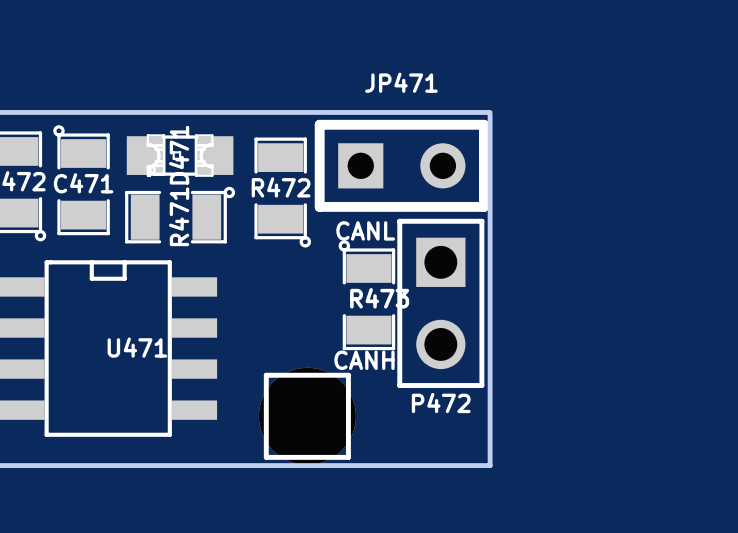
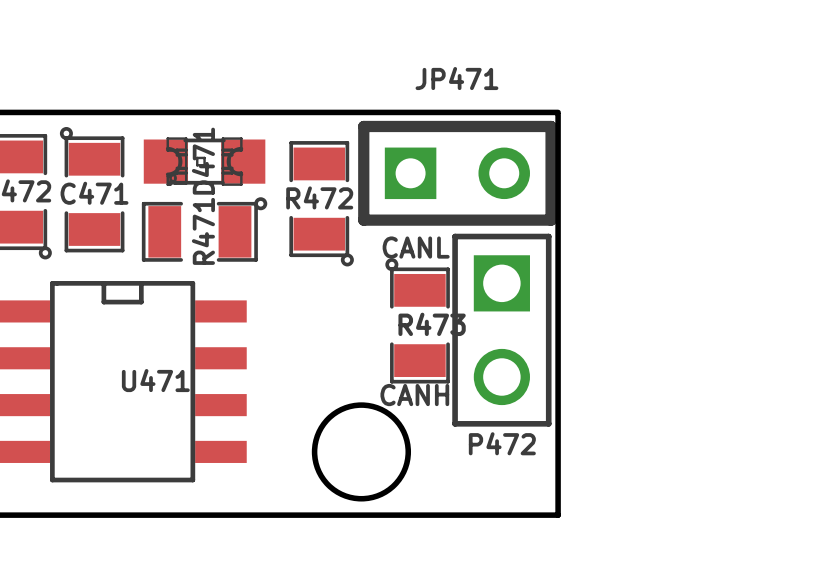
round board edge: none -> [311, 402, 412, 502]
part: (307, 416) -> none

